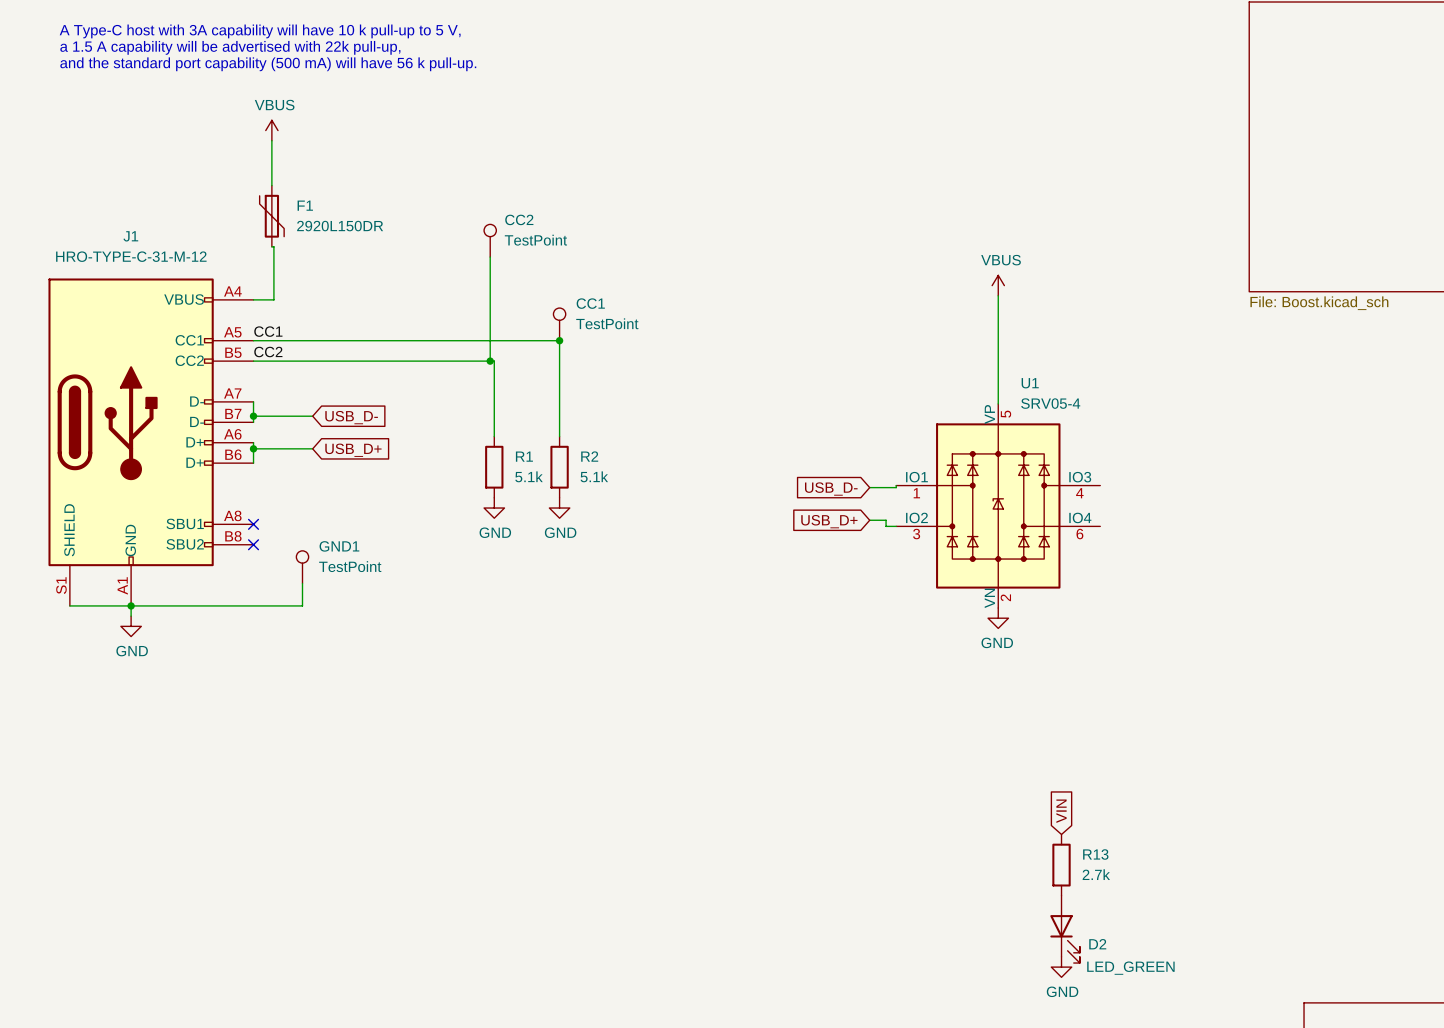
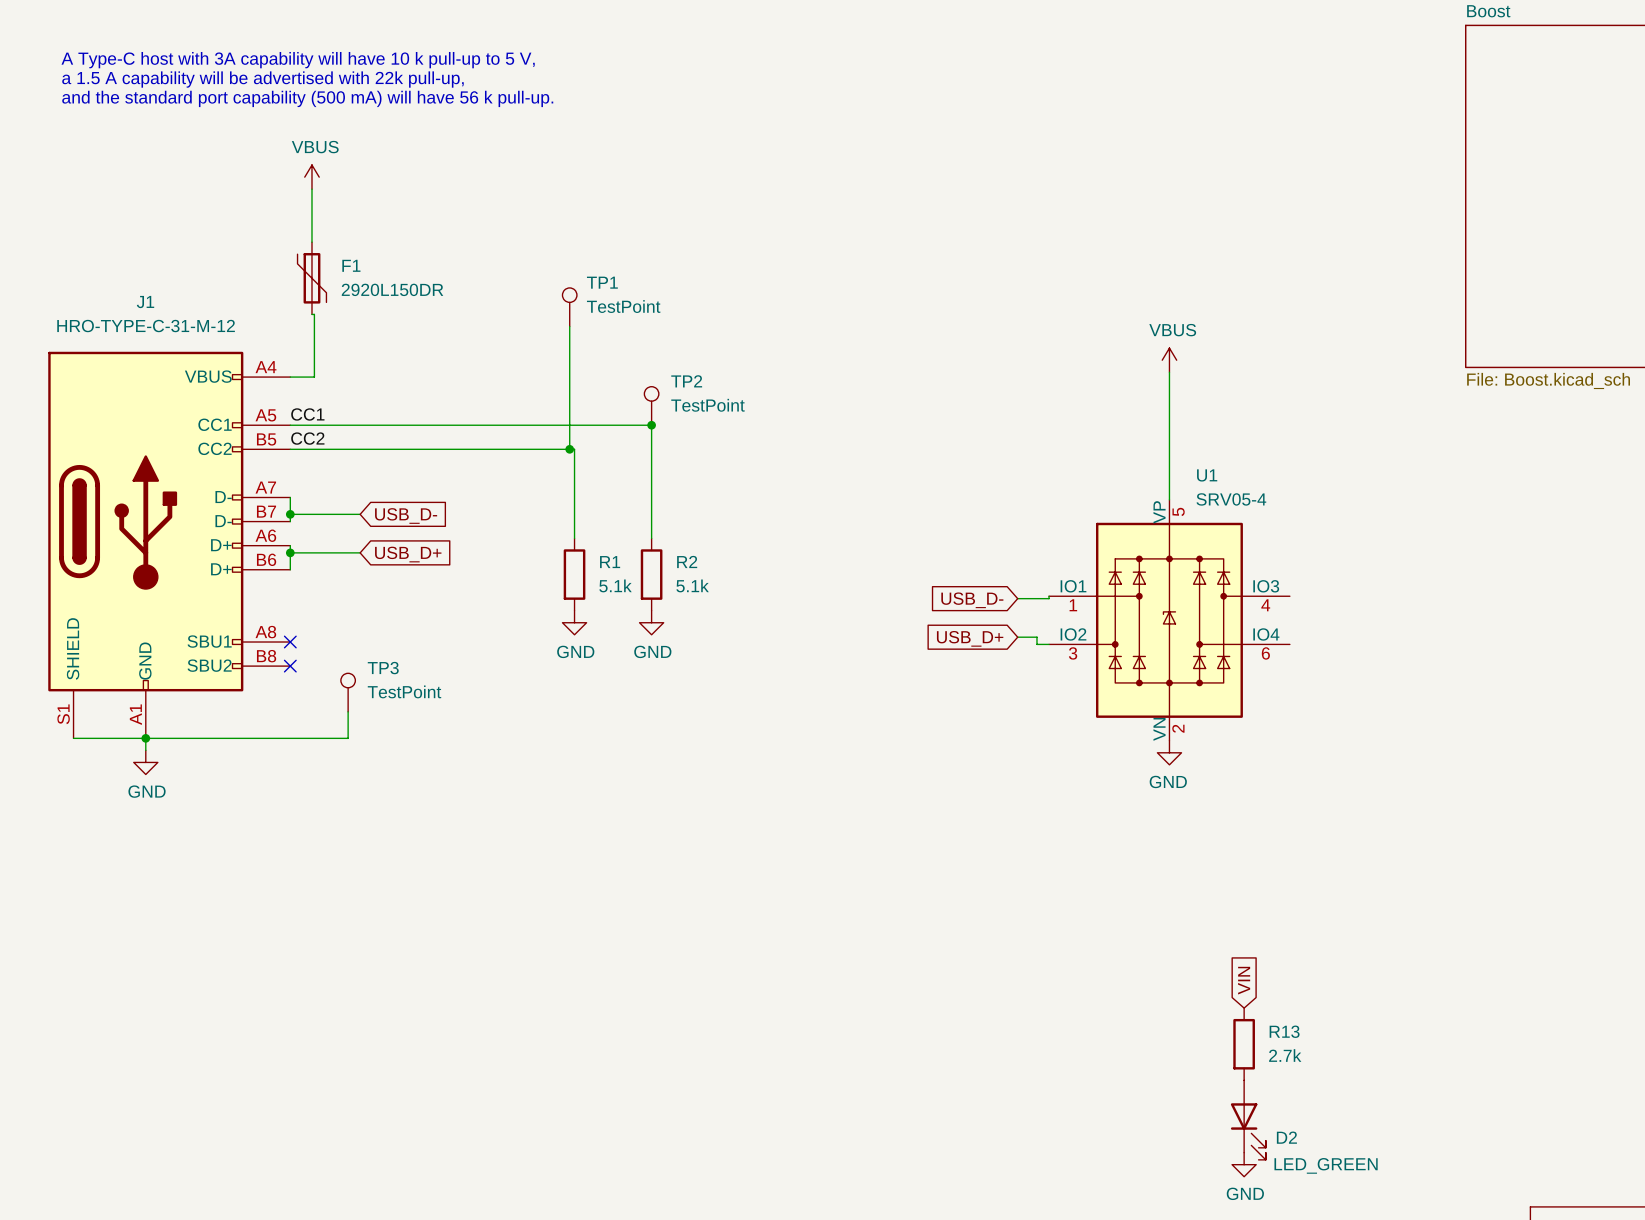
CC2 name: CC2 (519, 219) -> TP1 (602, 282)
CC1 name: CC1 (590, 303) -> TP2 (686, 381)
GND1 name: GND1 (339, 546) -> TP3 (383, 668)

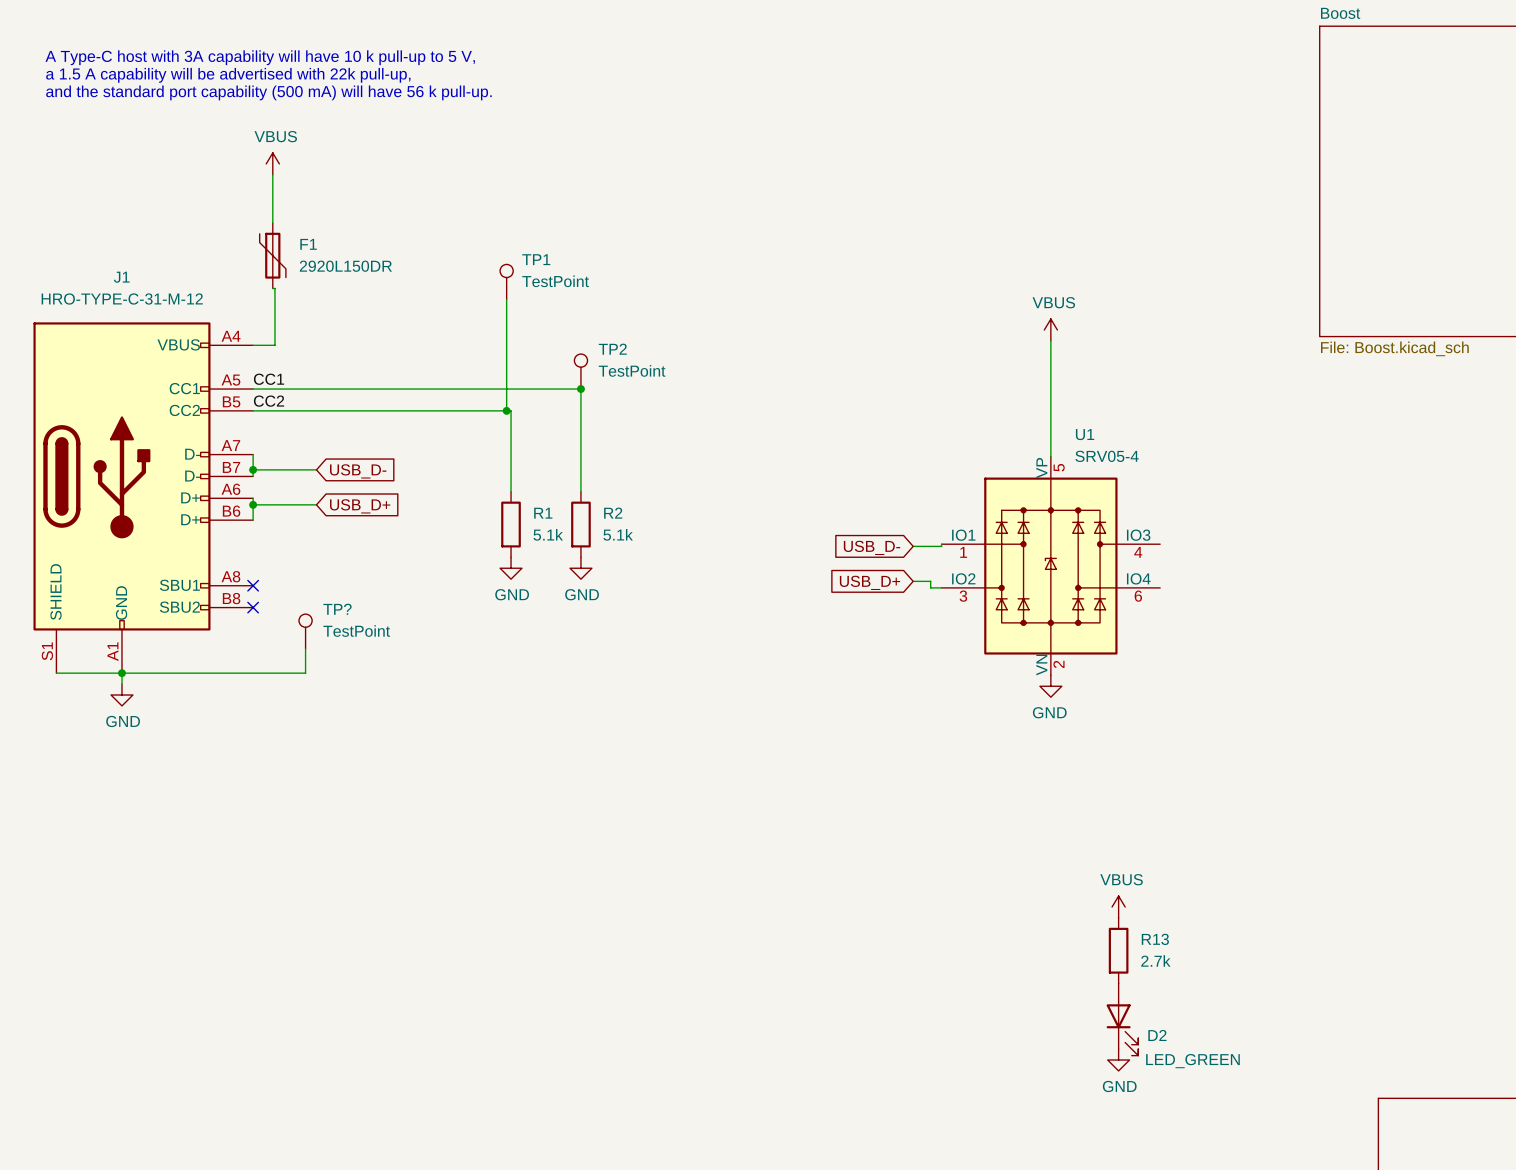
TP3 name: TP3 (383, 668) -> TP? (337, 609)
global label: VIN (1244, 980) -> none
power symbol: none -> VBUS (1118, 907)

